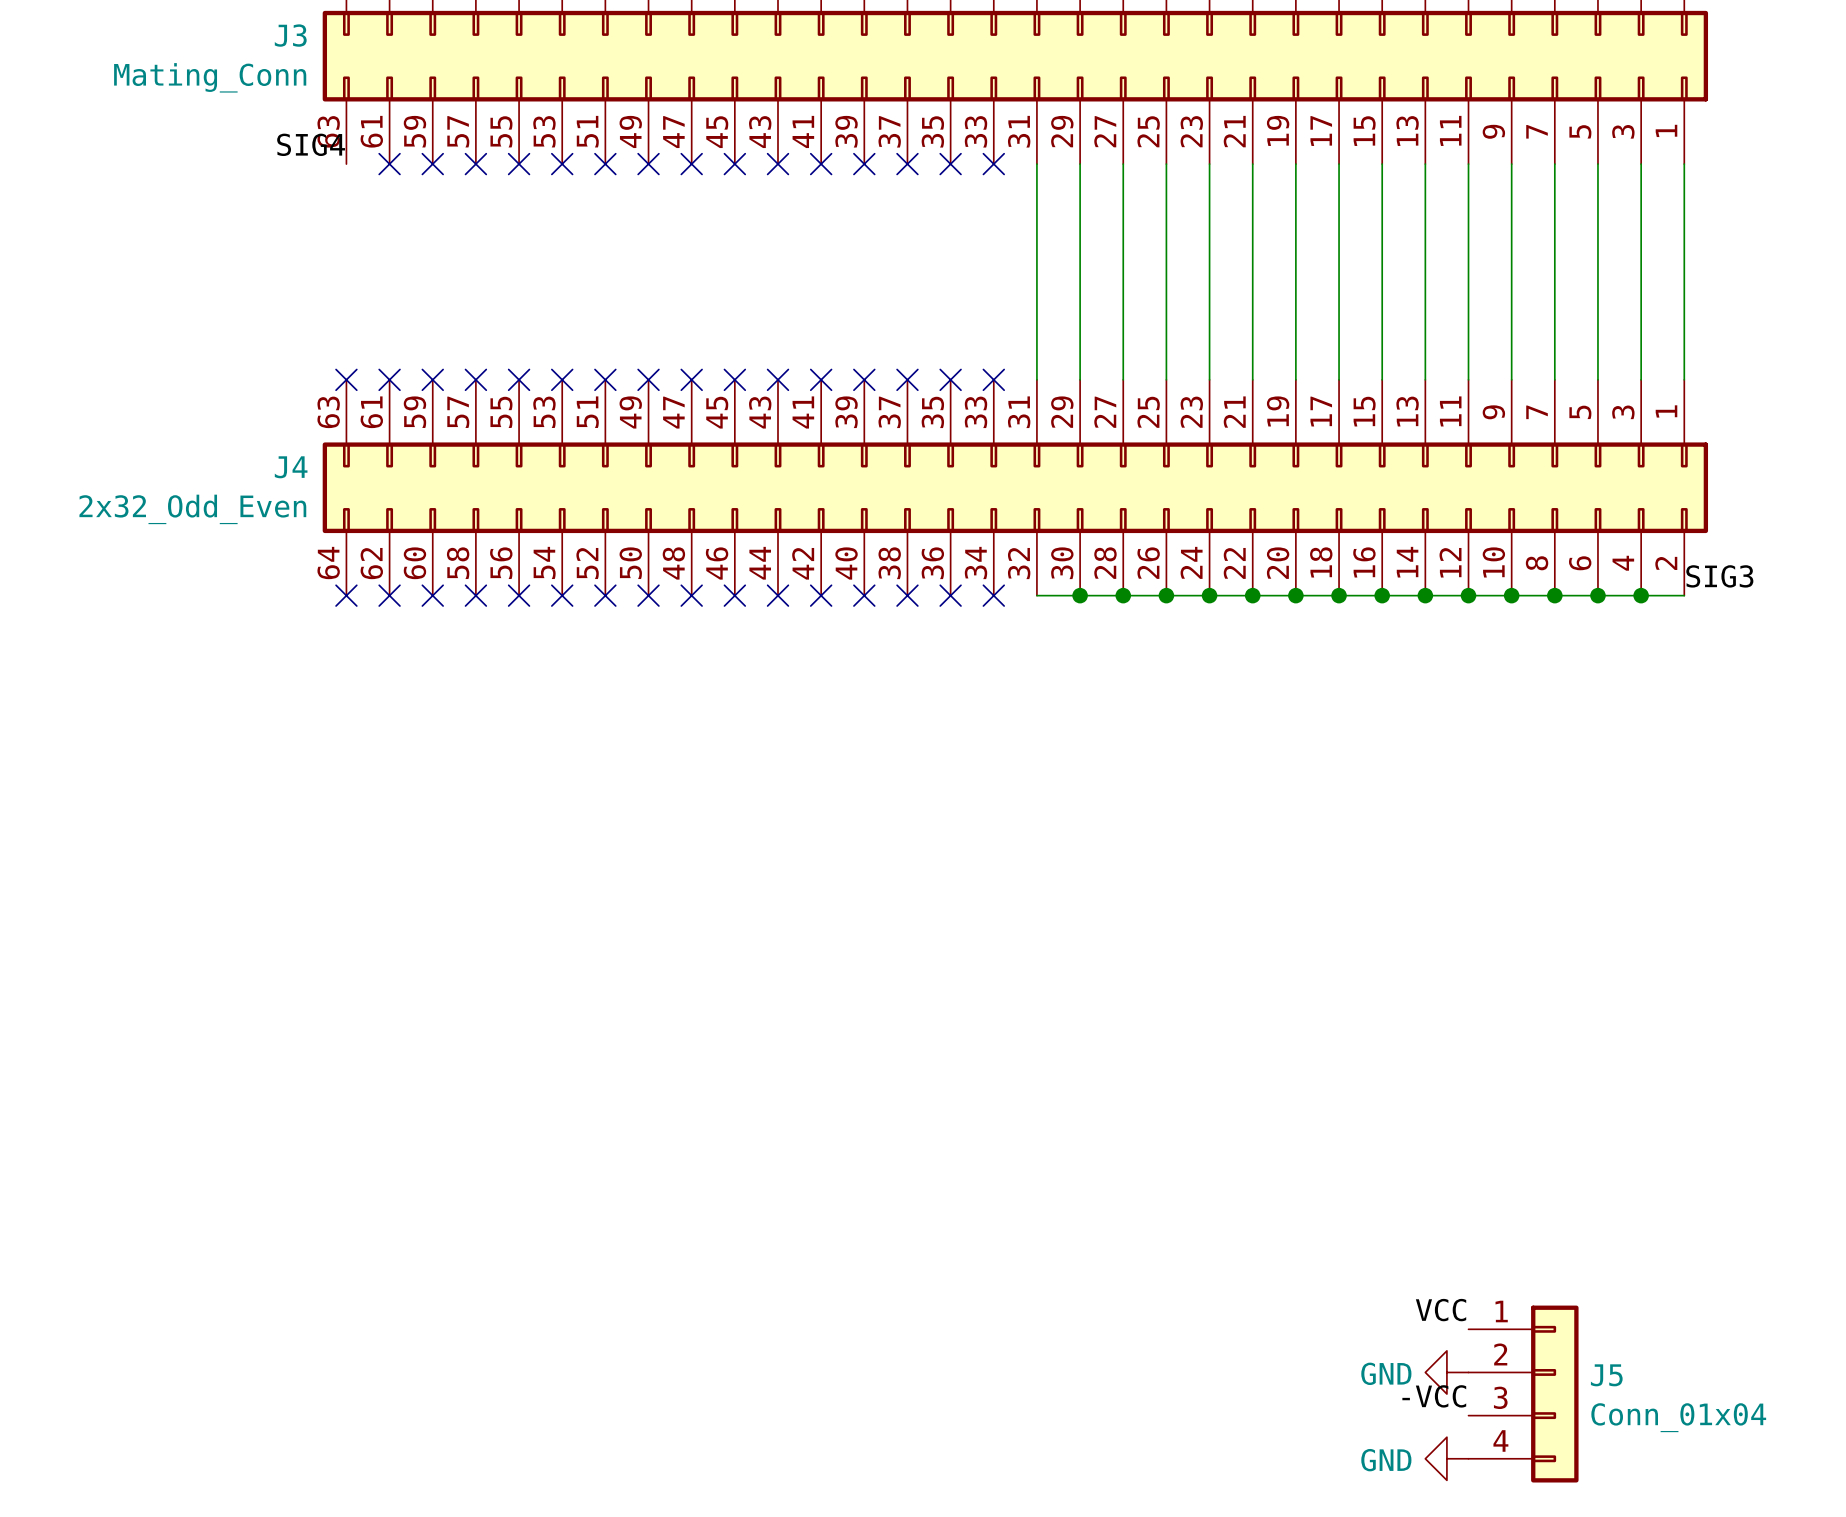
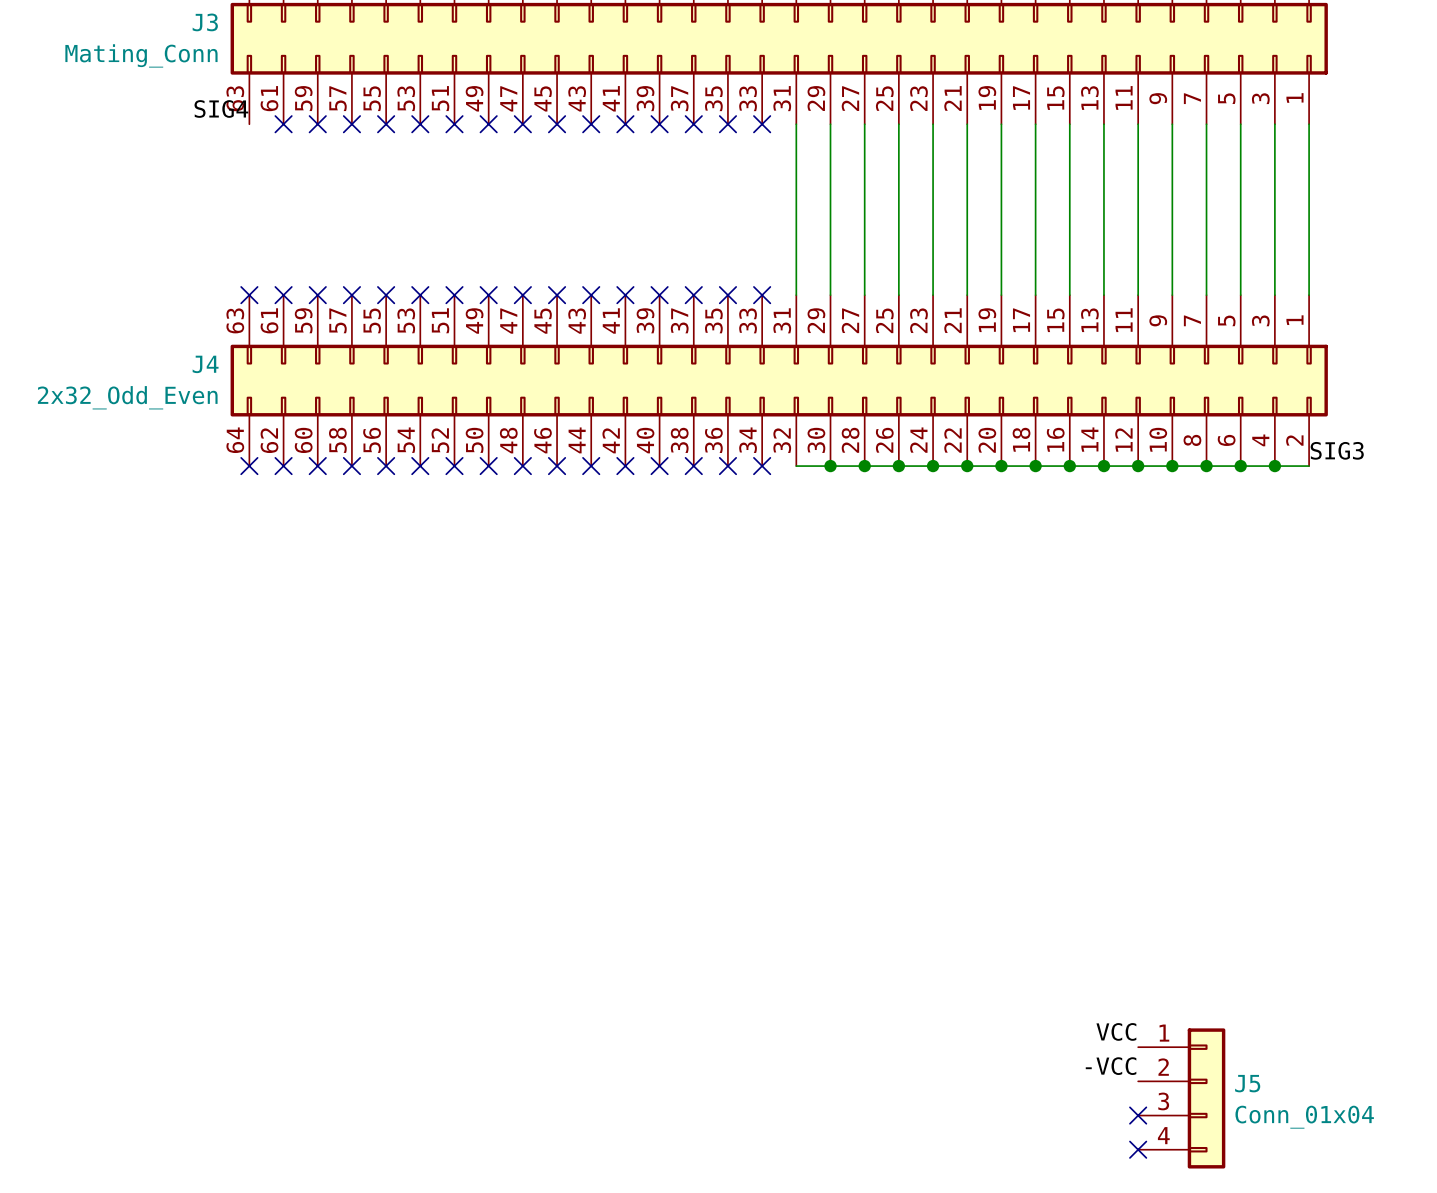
power symbol: GND (1446, 1372) -> none
label position: -VCC (1434, 1396) -> -VCC (1111, 1066)
no-connect mark: none -> (1138, 1115)
power symbol: GND (1446, 1458) -> none
no-connect mark: none -> (1138, 1149)

